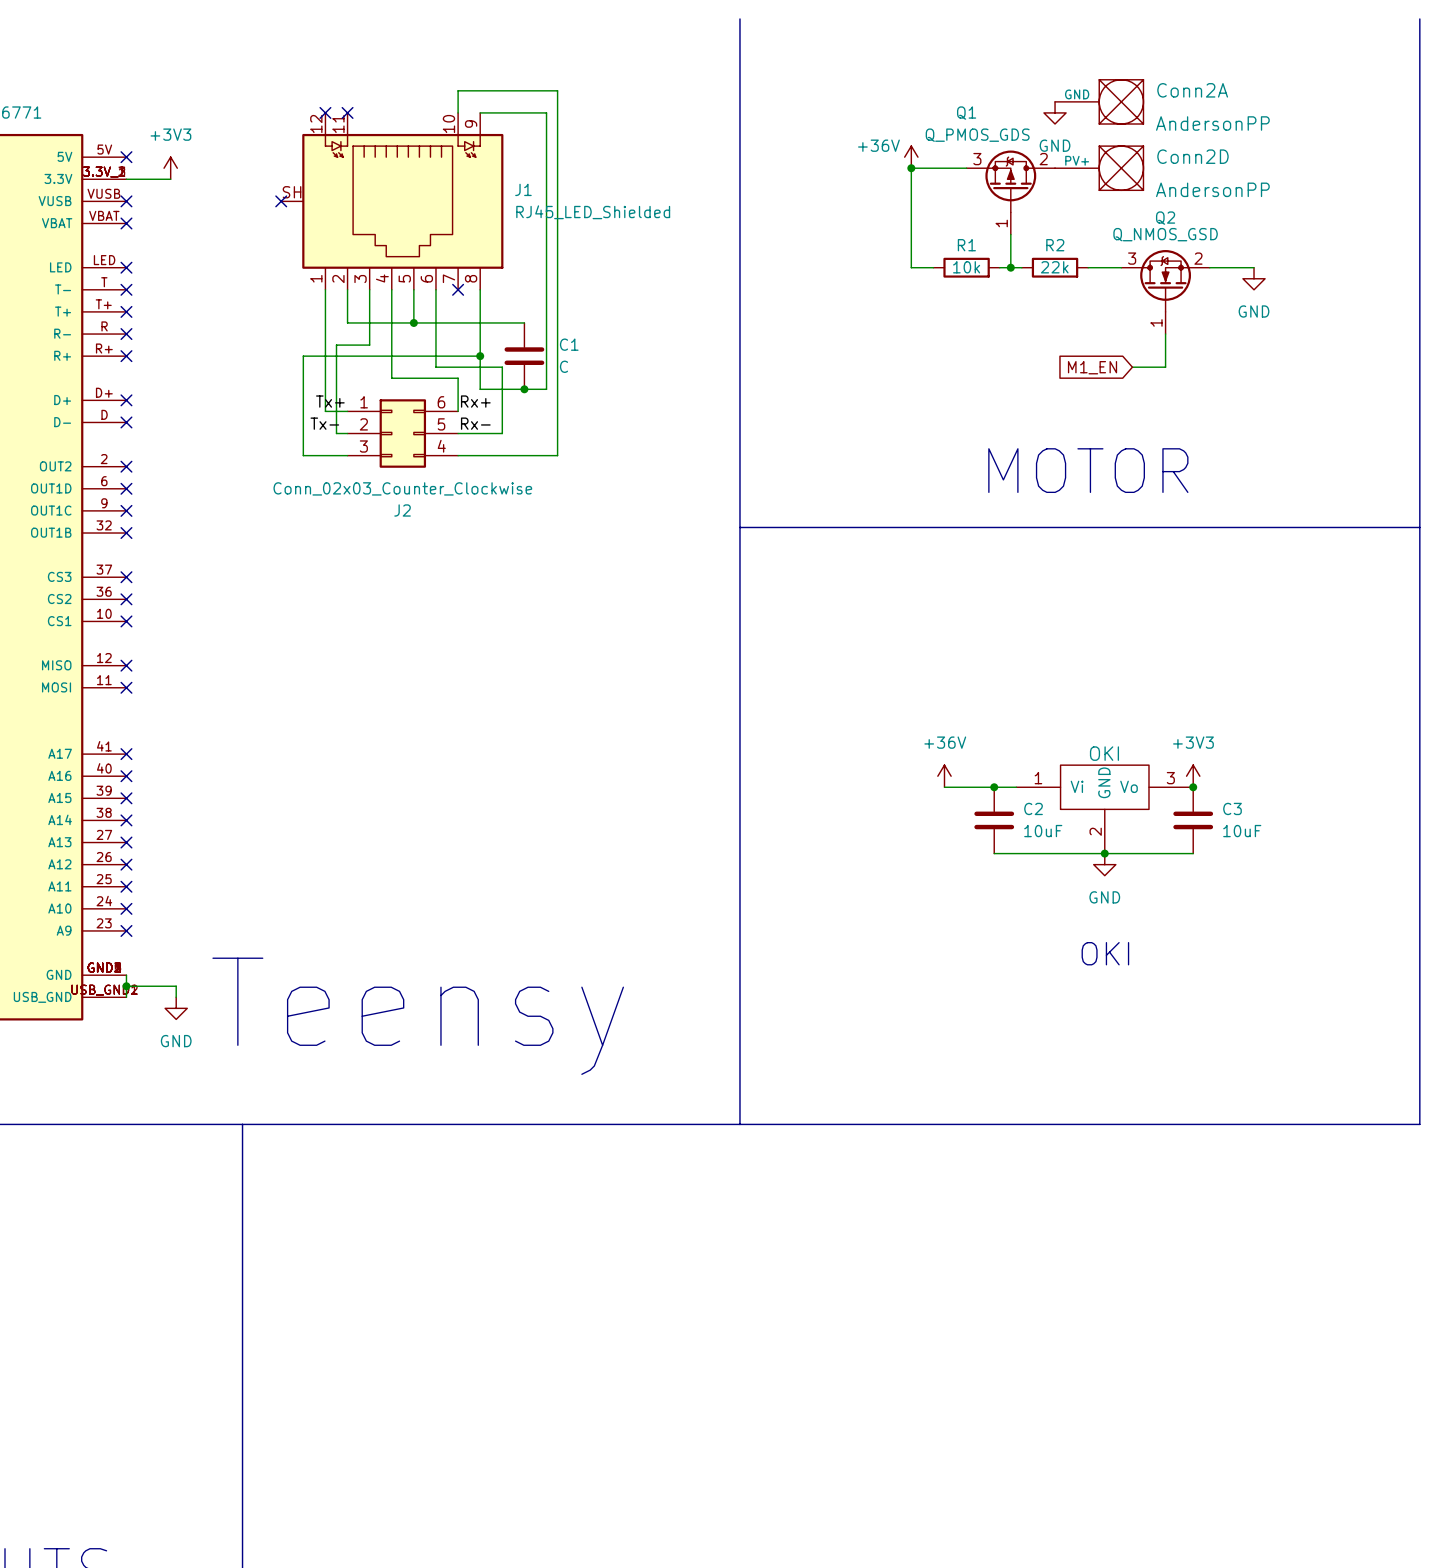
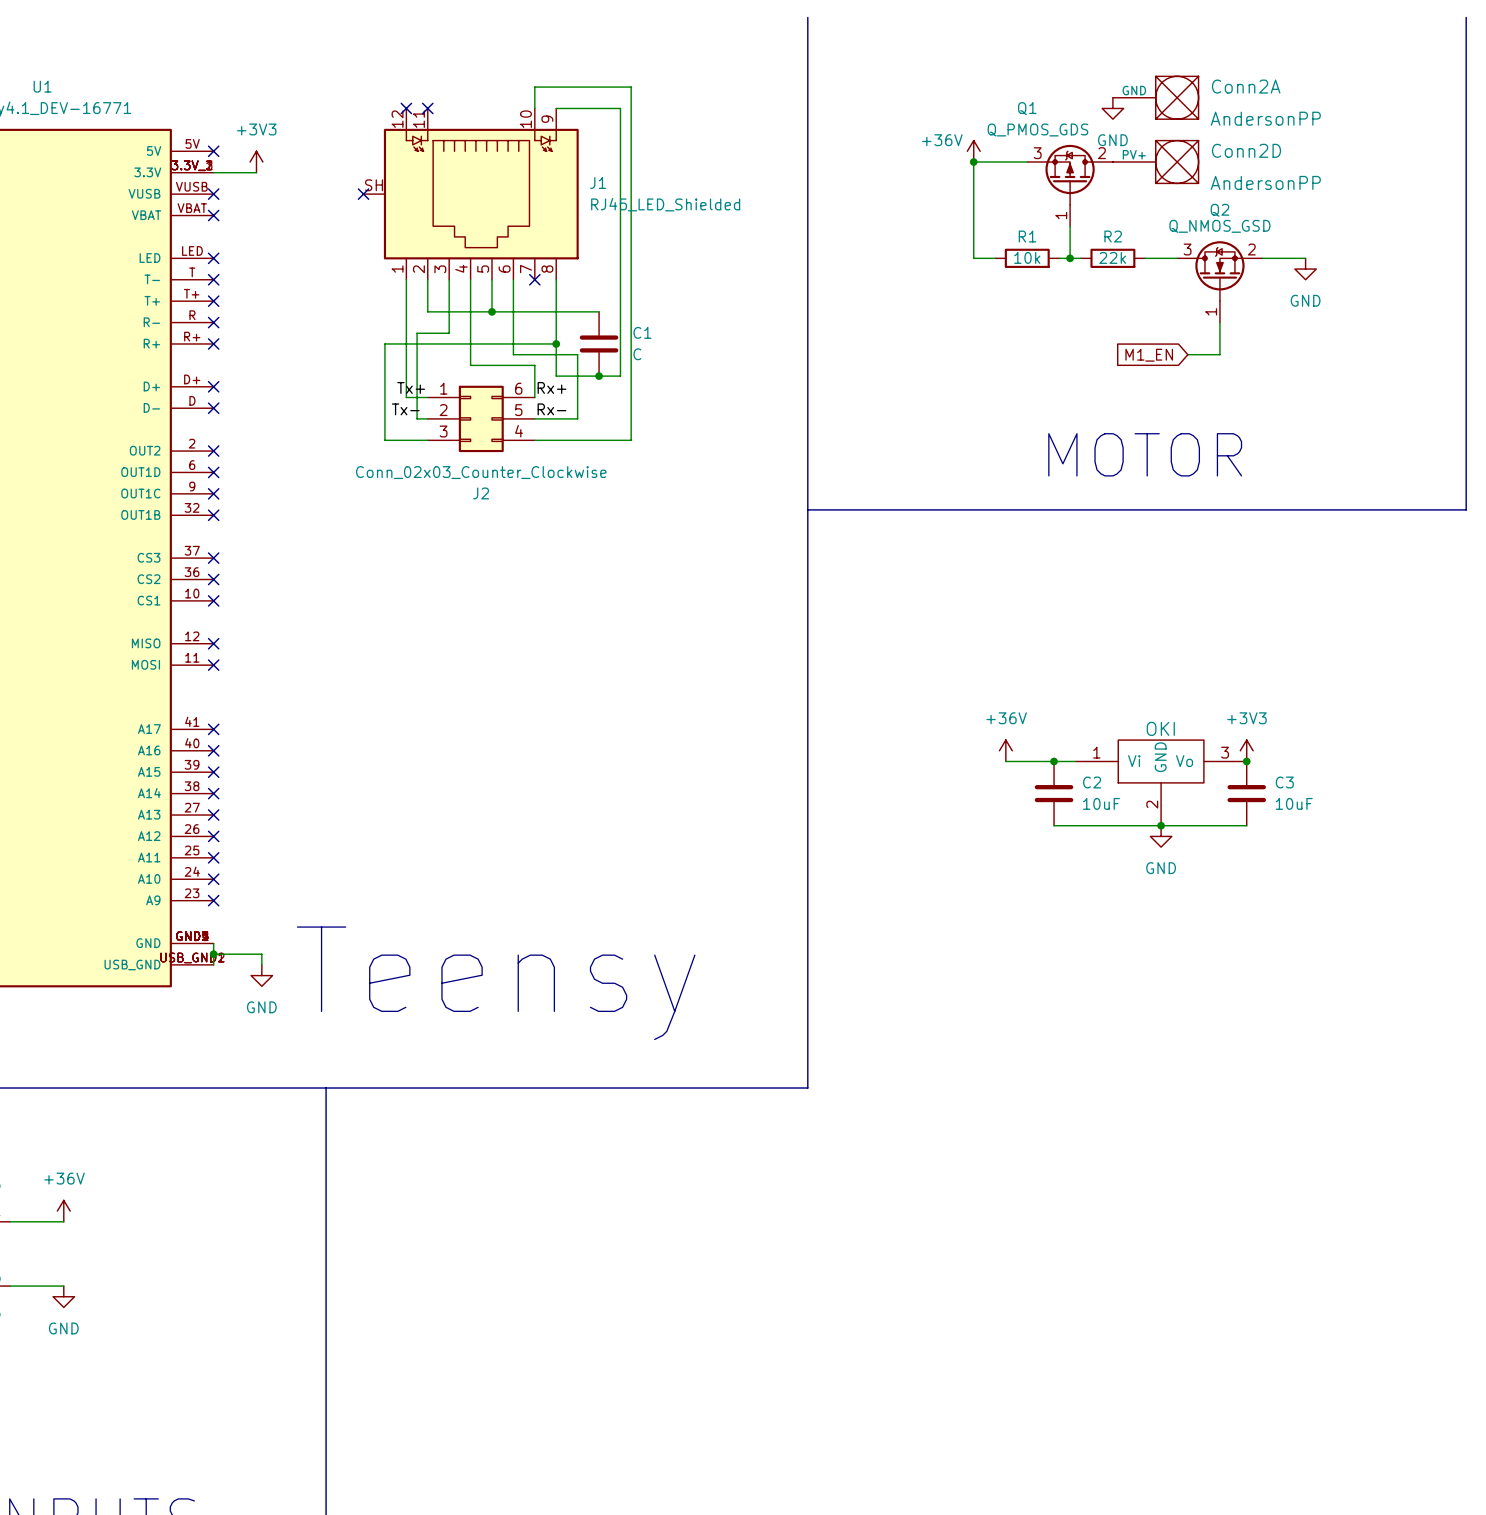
line: (1419, 527) (1419, 1124) (739, 1124) -> none
text: OKI (1105, 953) -> none

